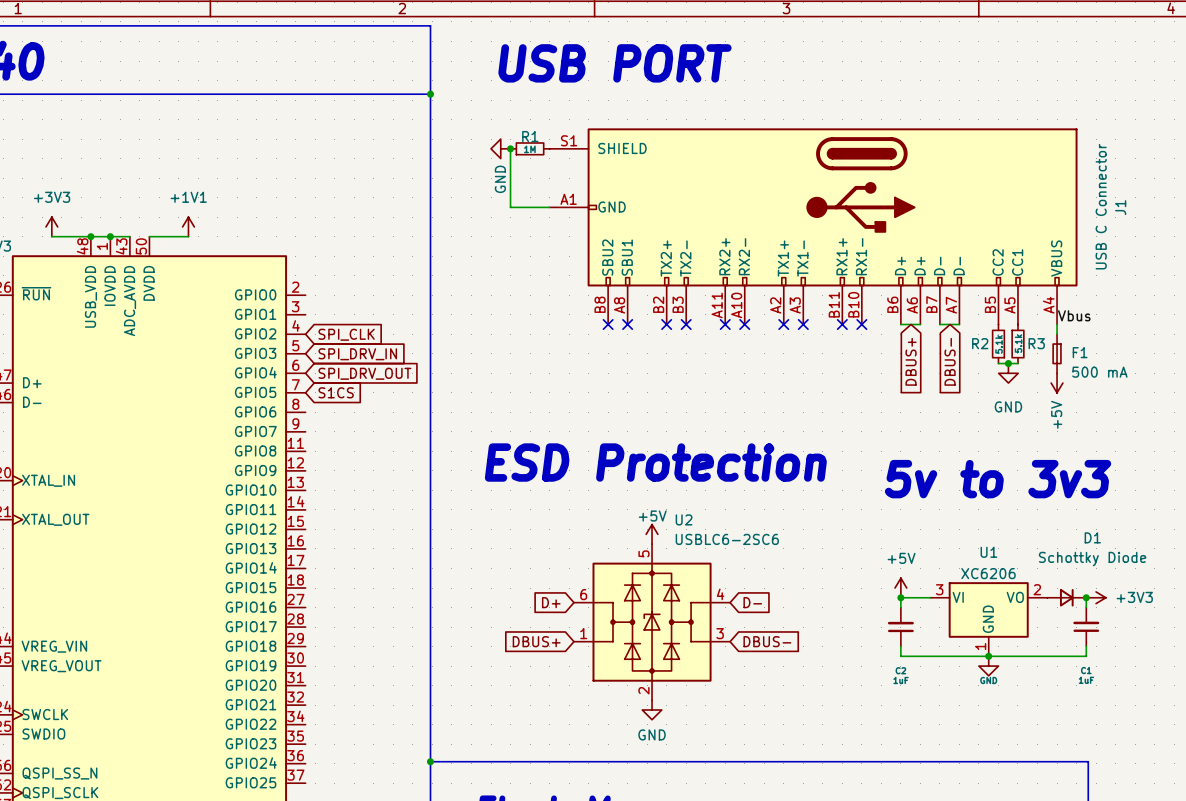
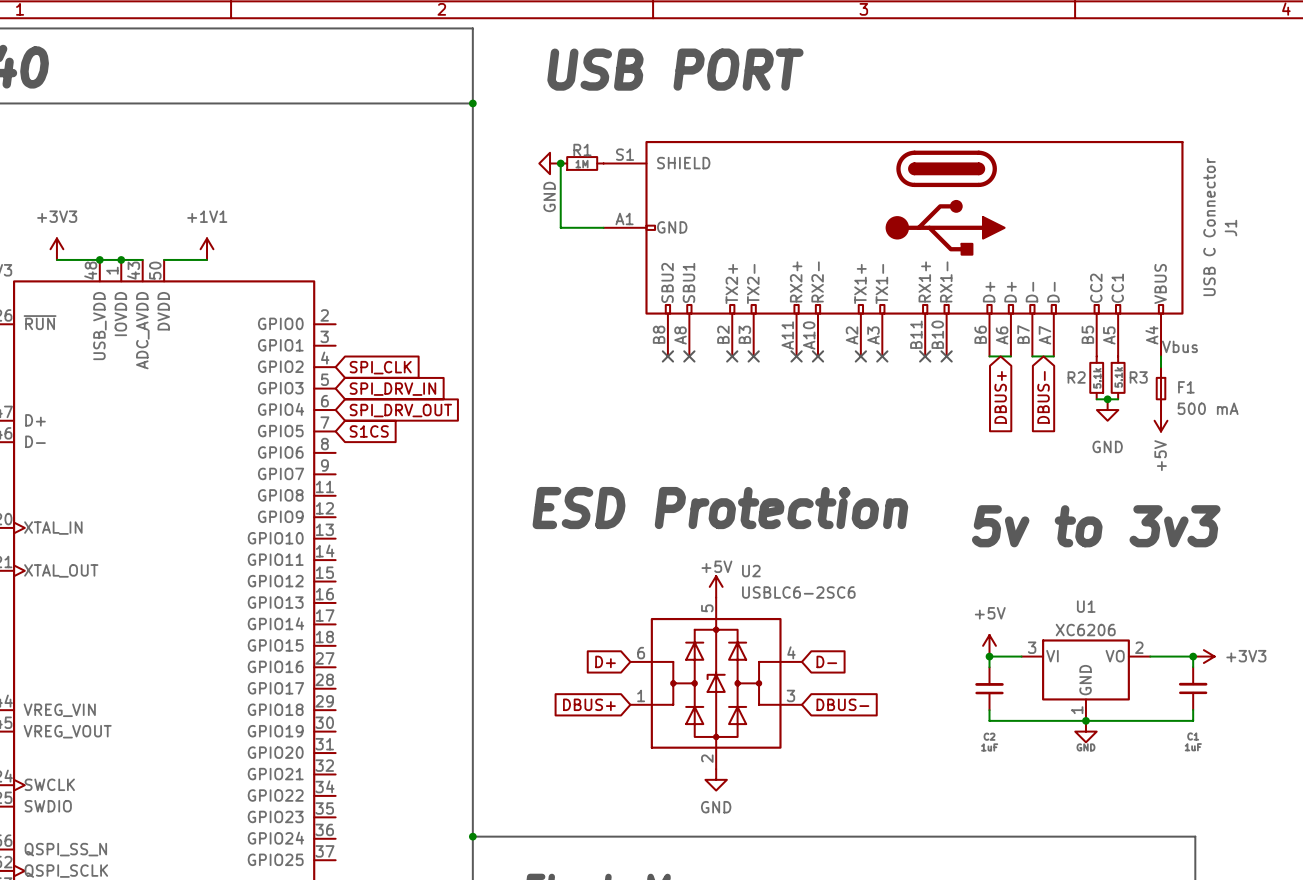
D1: Schottky Diode (1066, 597) -> none

